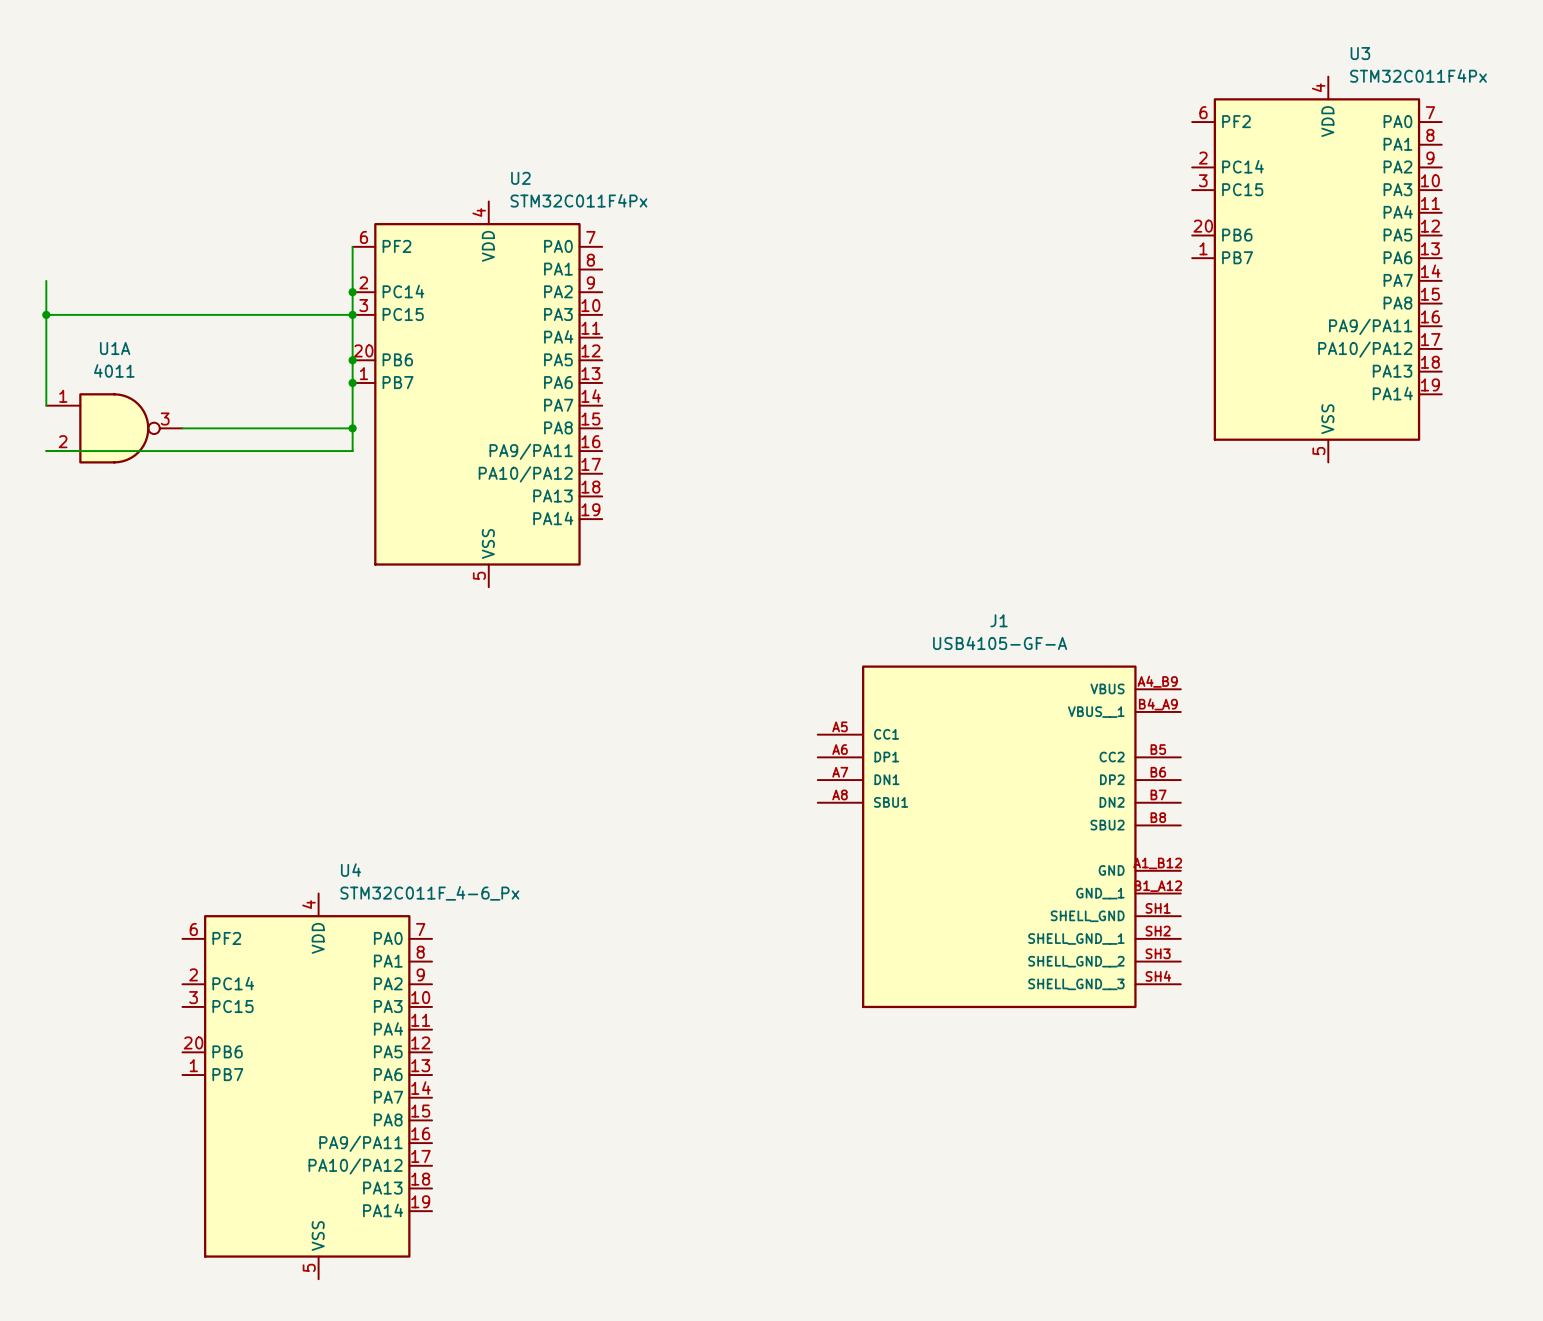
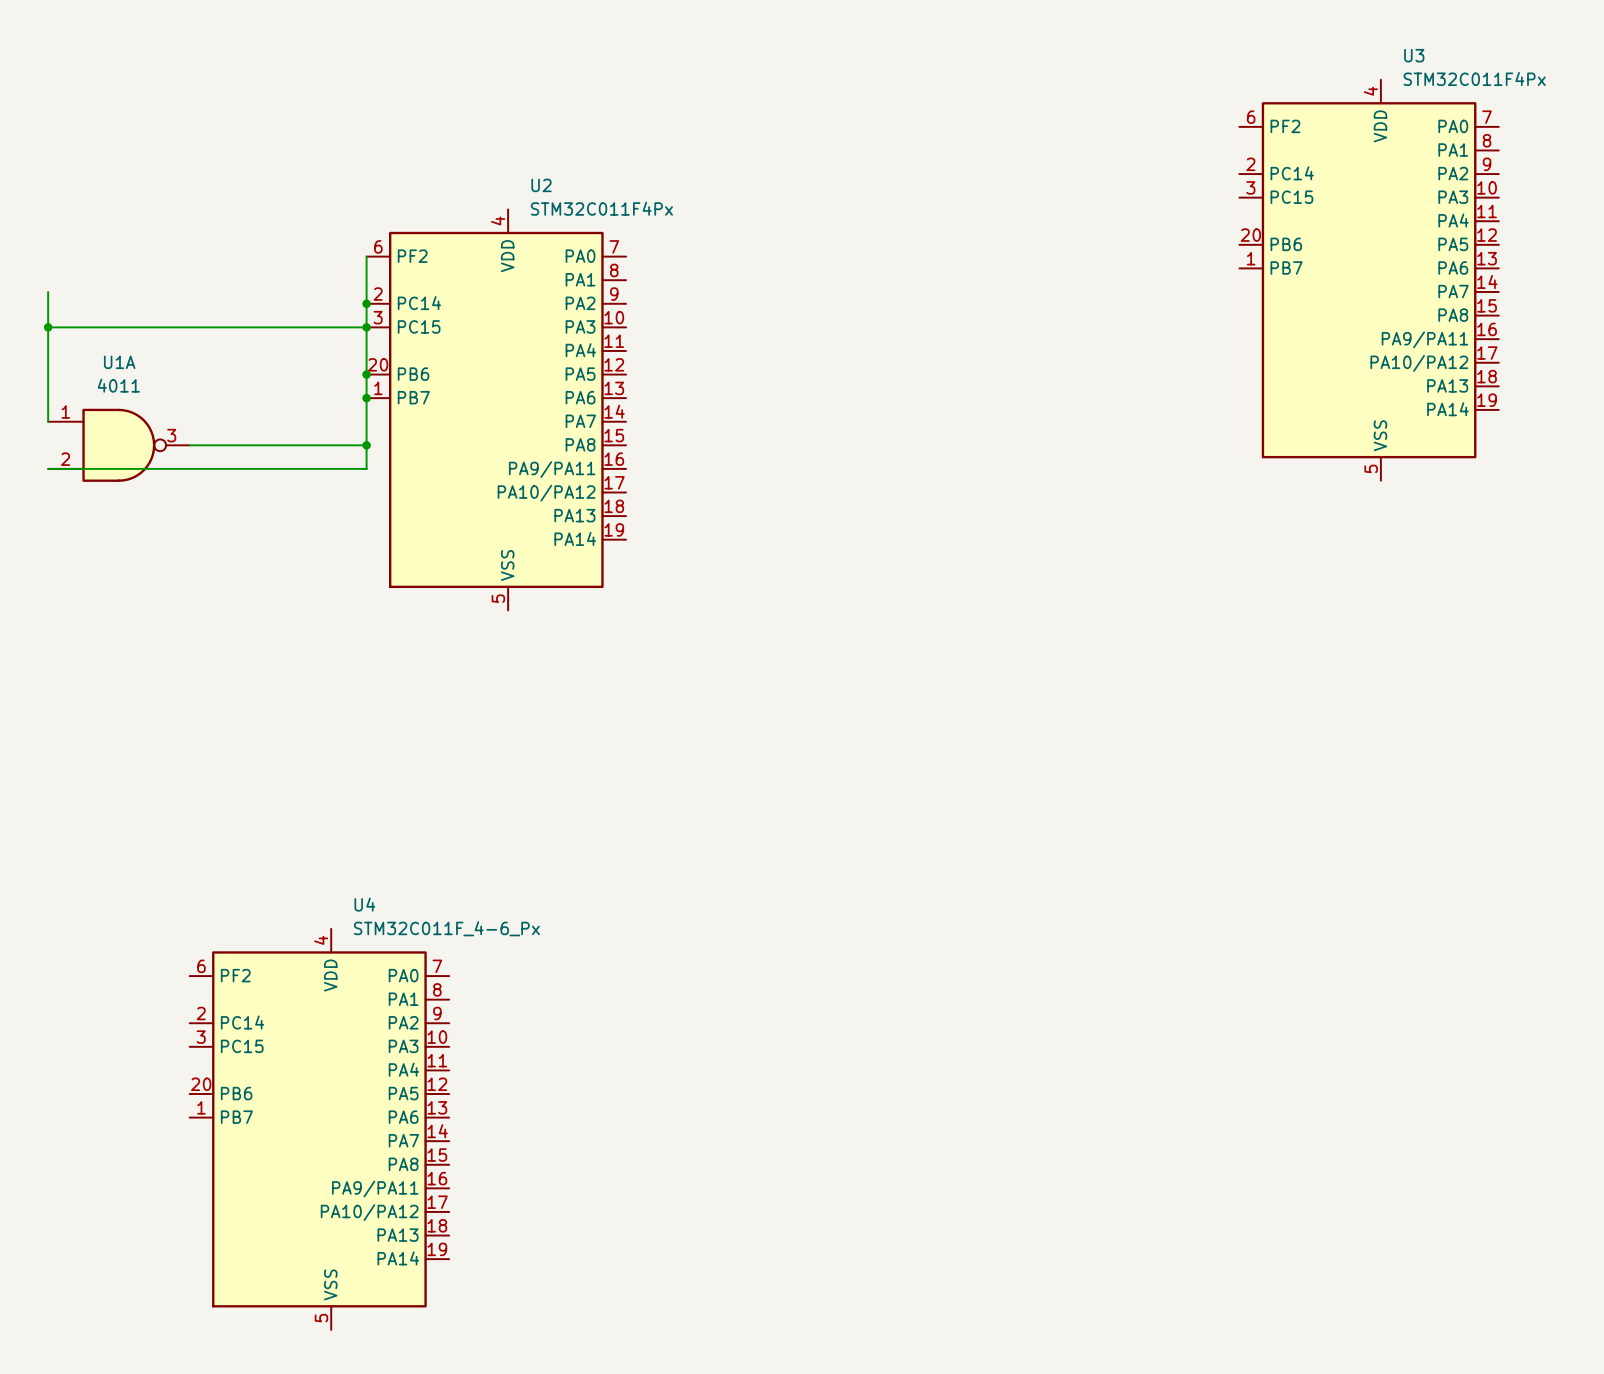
J1: USB4105-GF-A (999, 836) -> none

